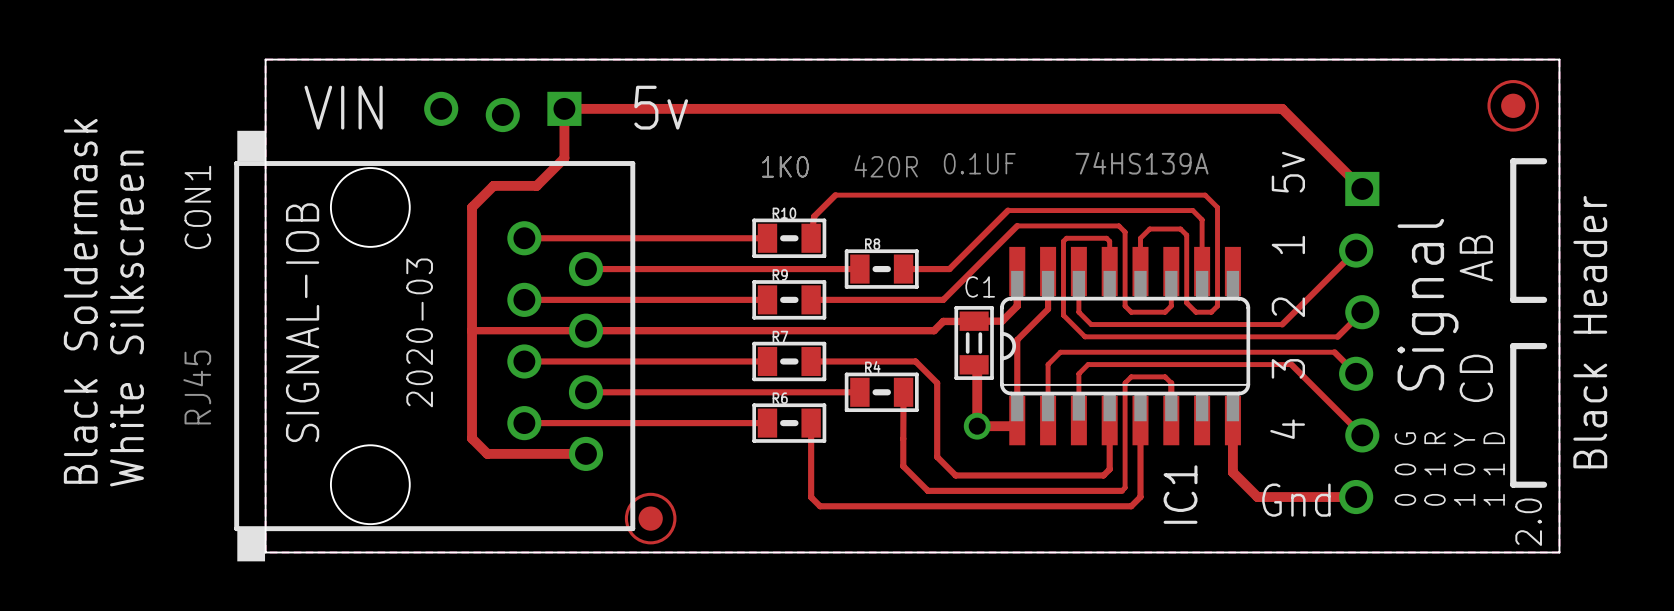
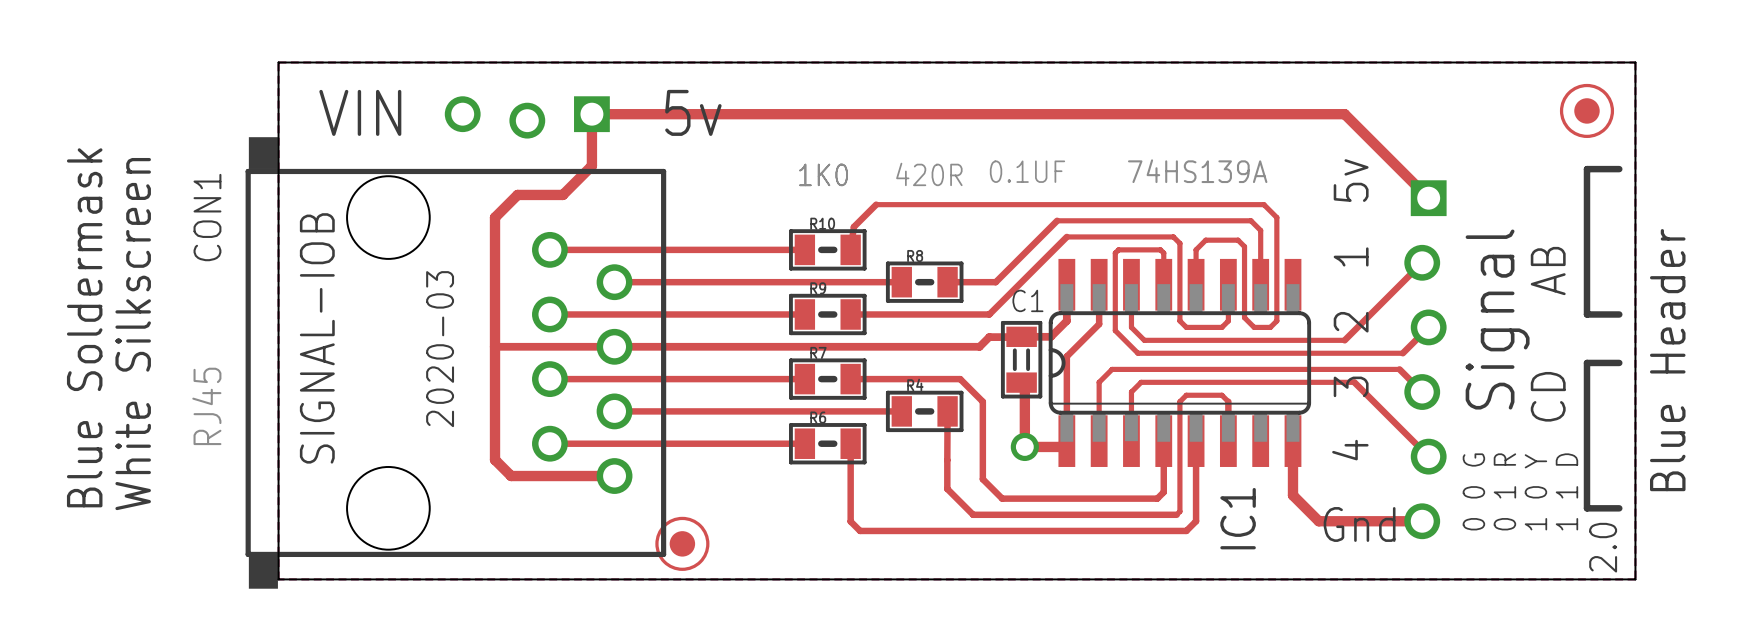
text: Black Soldermask (80, 301) -> Blue Soldermask (84, 327)
text: Black Header (1590, 332) -> Blue Header (1667, 360)

